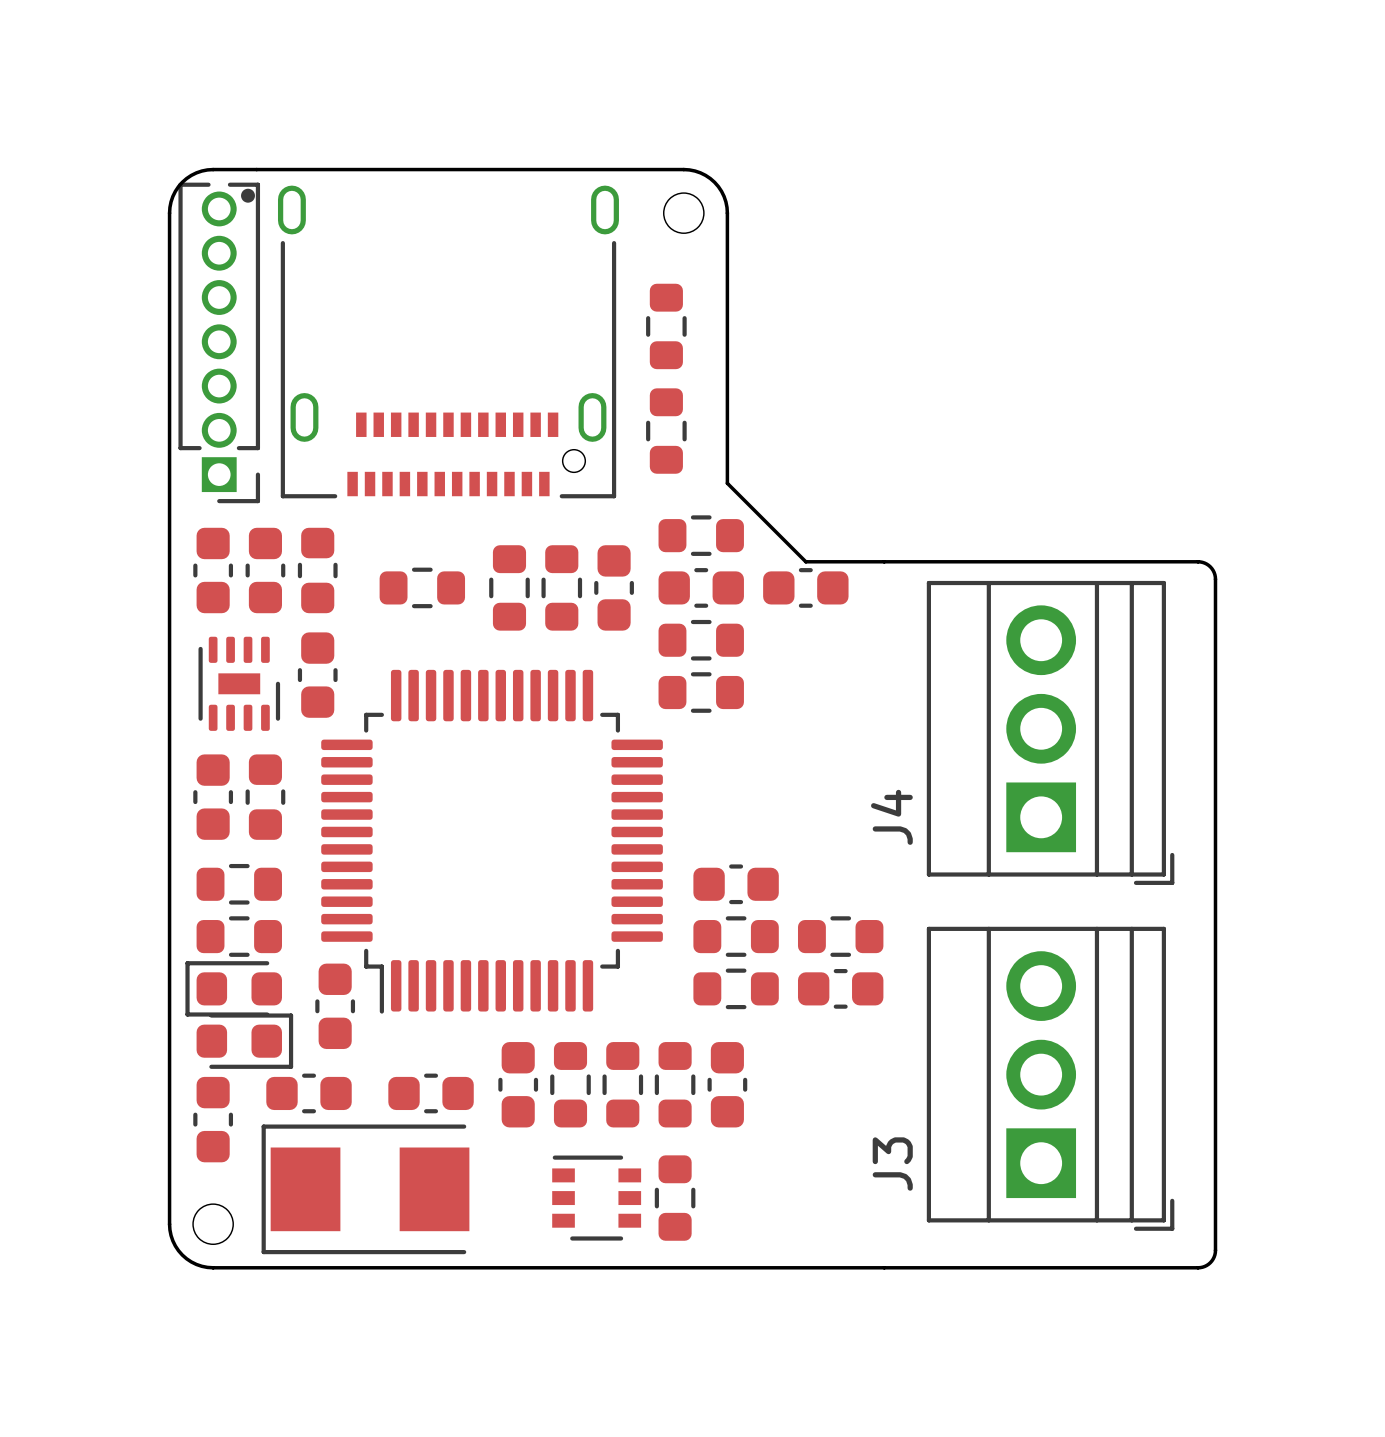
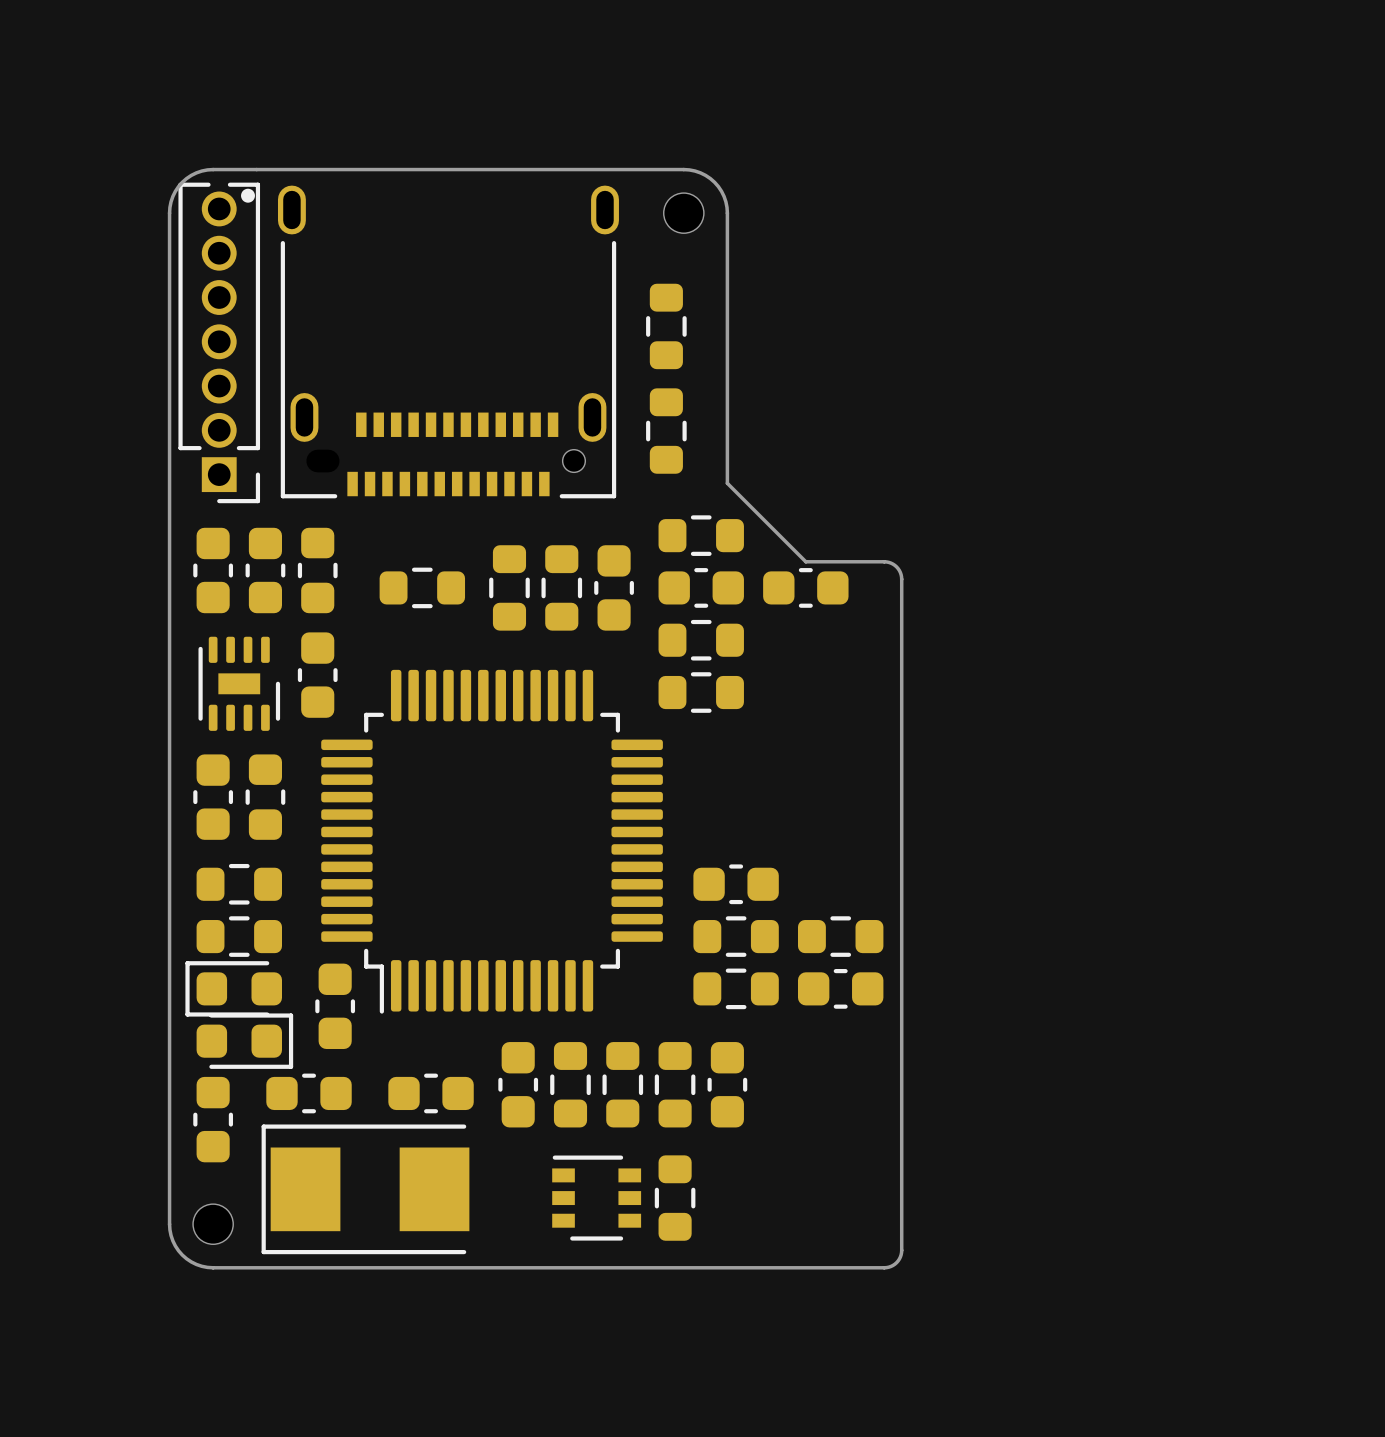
board edge: (884, 561) (1198, 561) (1210, 566) (1215, 579) (1214, 1257) (1206, 1265) (1198, 1267) (884, 1267) -> (884, 561) (896, 566) (901, 579) (901, 1250) (896, 1262) (884, 1267)
J4: (1050, 732) -> none
J3: (1050, 1078) -> none

